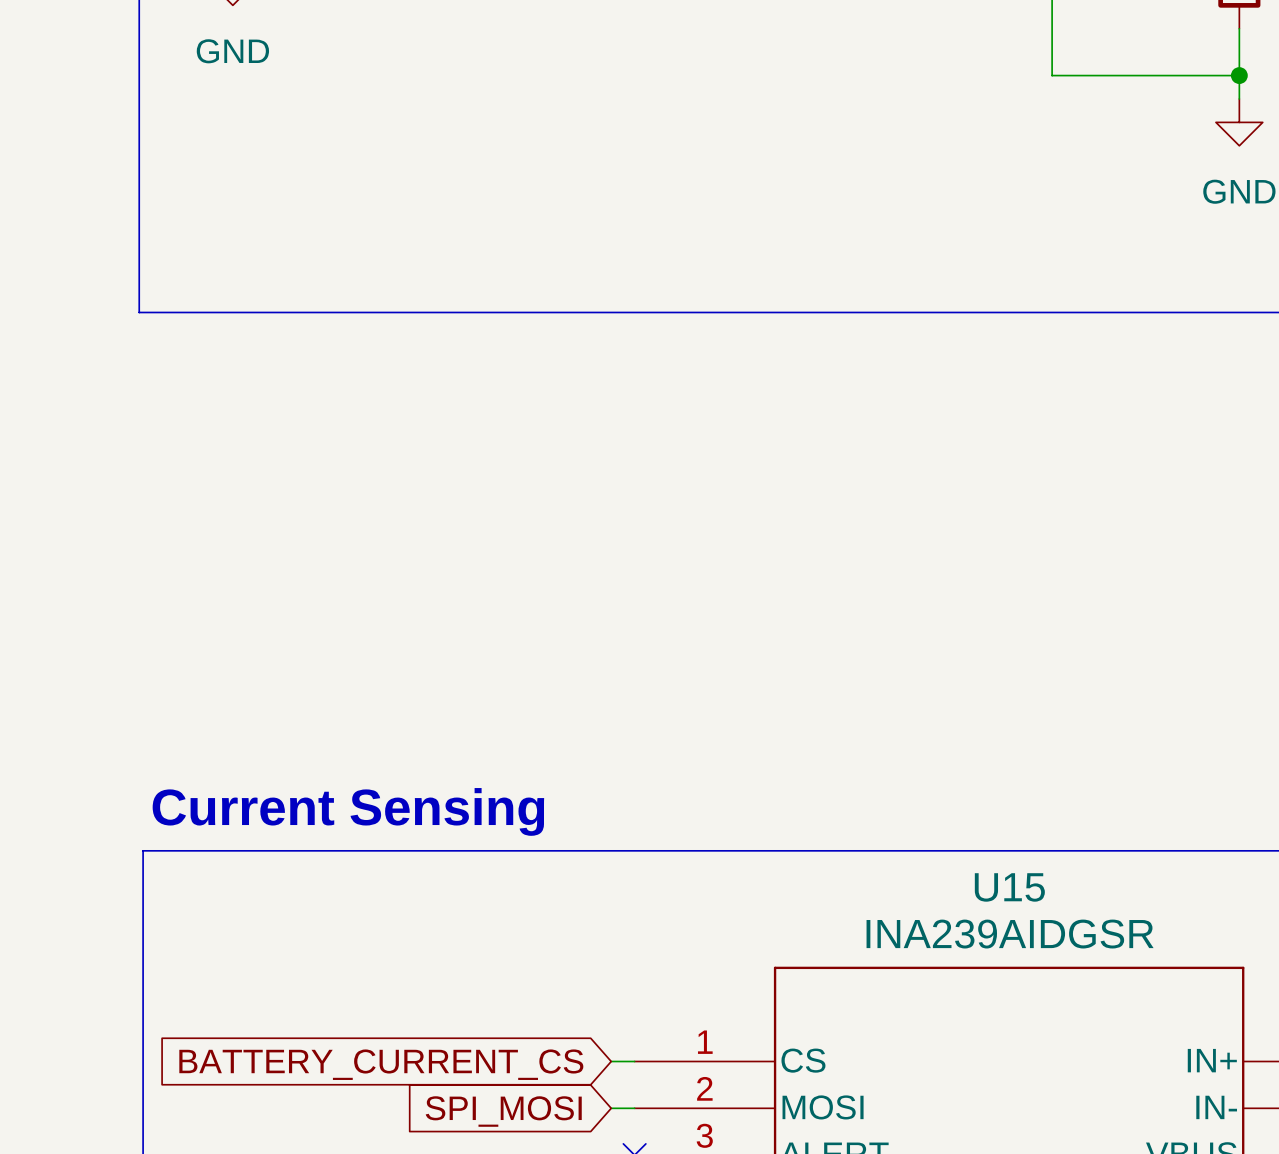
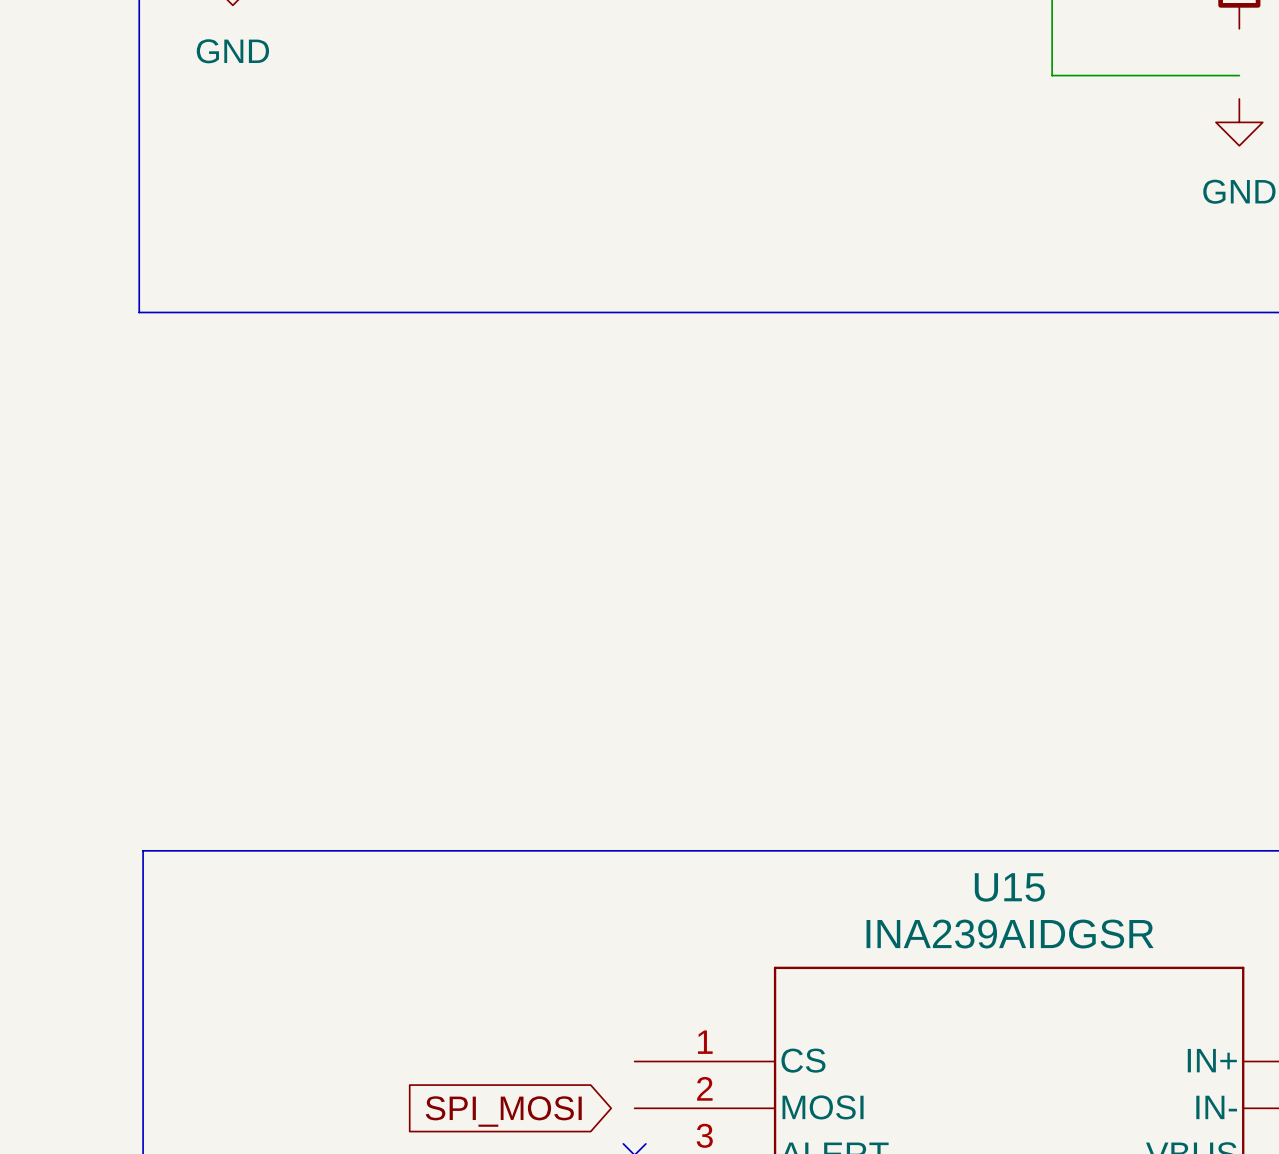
wire: (1239, 28) (1239, 98) -> none
junction: (1239, 75) -> none
text: Current Sensing (348, 811) -> none
wire: (611, 1061) (634, 1061) -> none
global label: BATTERY_CURRENT_CS (381, 1064) -> none
wire: (611, 1108) (634, 1108) -> none

